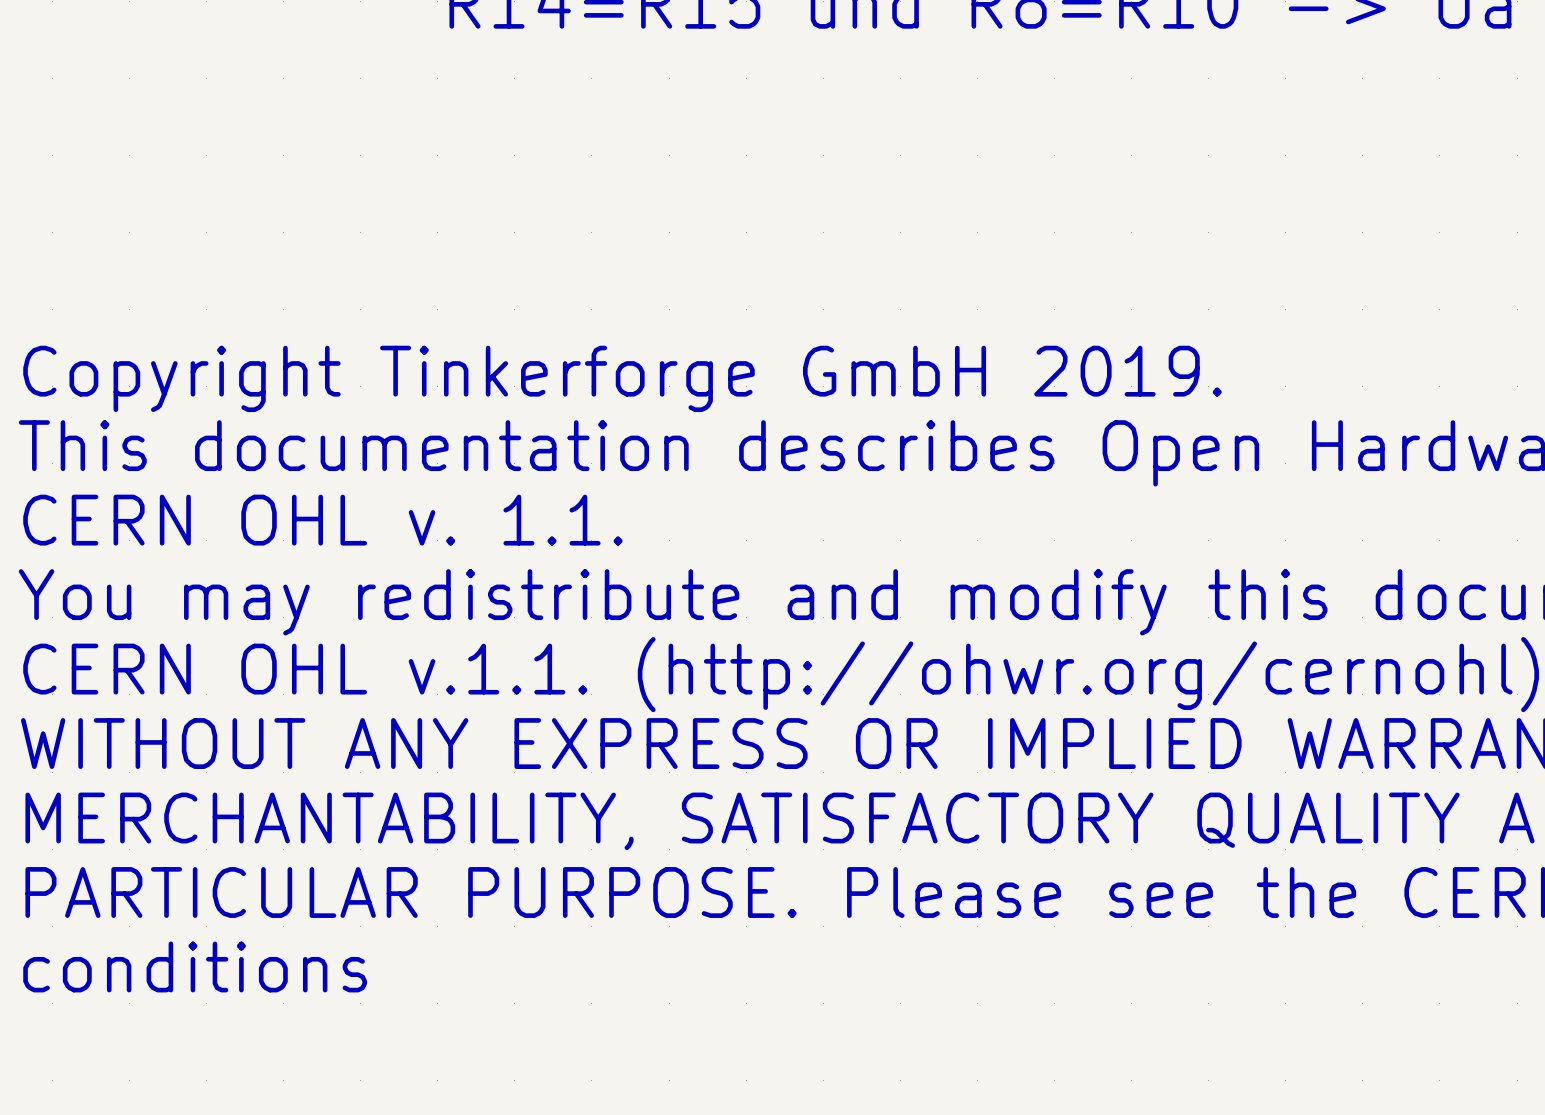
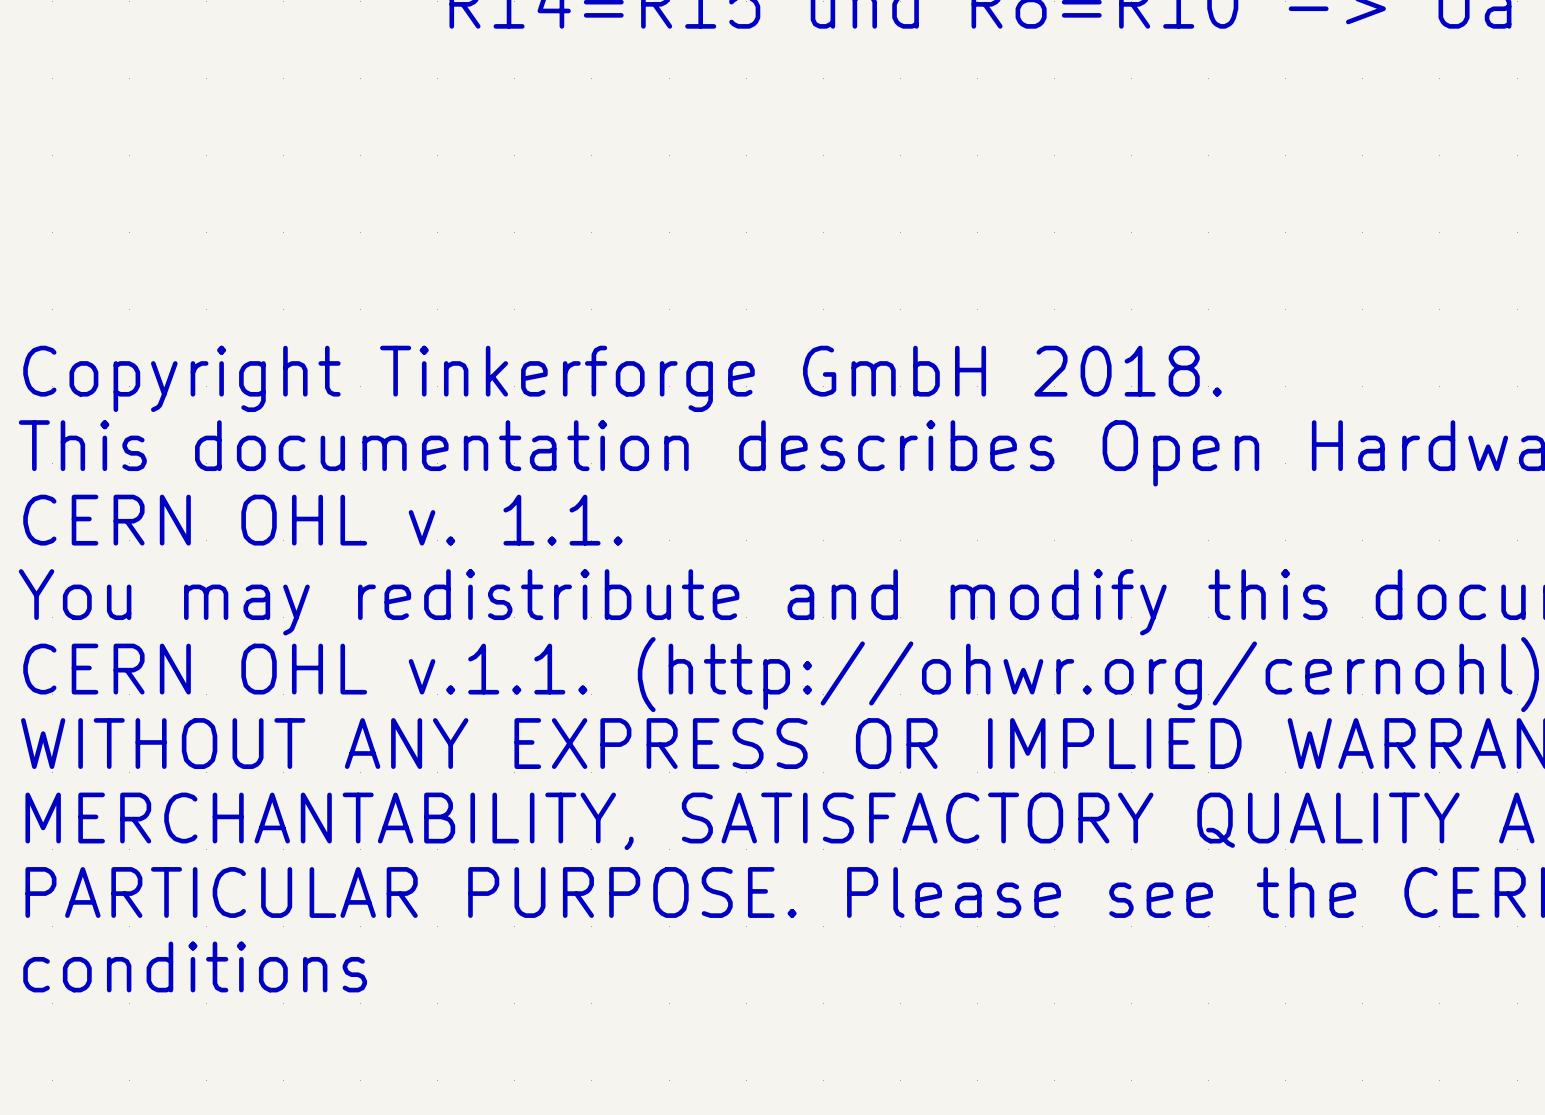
text: Copyright Tinkerforge GmbH 2019. (622, 378) -> Copyright Tinkerforge GmbH 2018. (622, 378)

